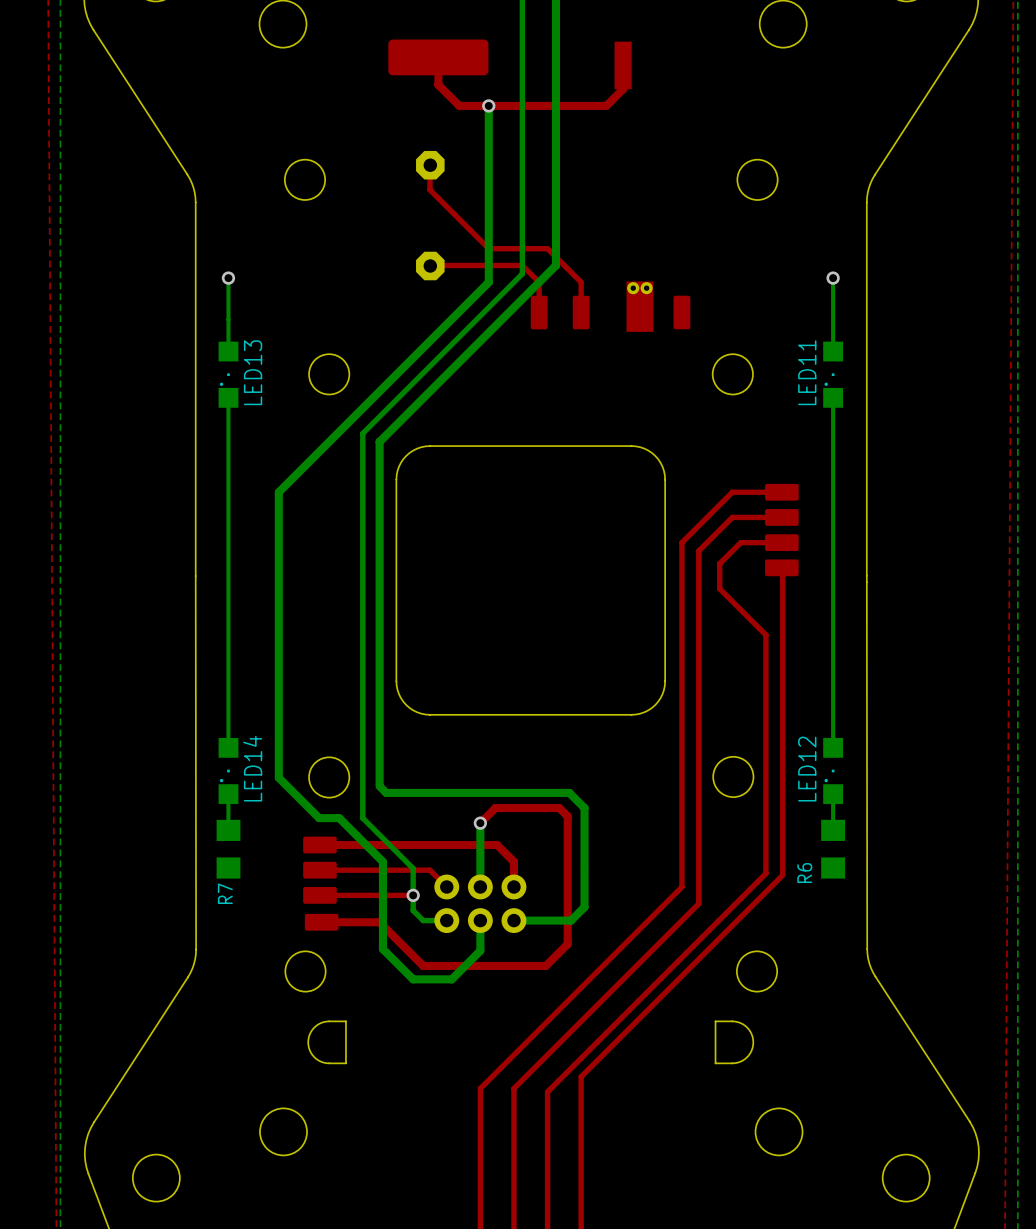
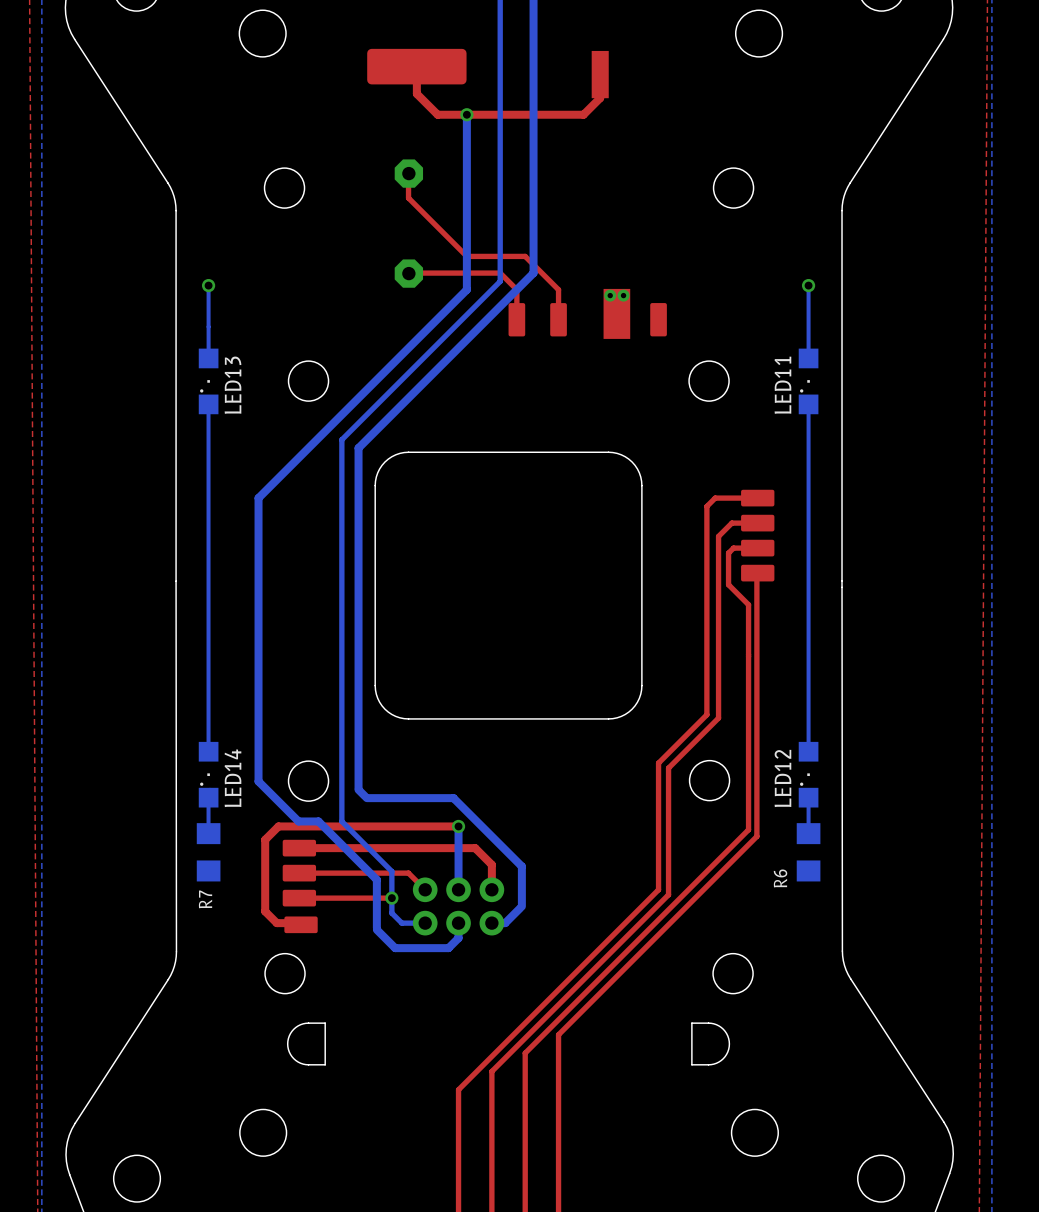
top track: (739, 492) (732, 492) (681, 542) (681, 759) -> (715, 498) (706, 506) (706, 714) (658, 763)
top track: (755, 517) (732, 517) (698, 551) (698, 903) (513, 1088) -> (731, 523) (718, 536) (718, 718) (668, 768) (668, 894) (491, 1071) (491, 1089)
top track: (757, 542) (740, 542) (719, 563) (719, 588) (765, 635) (765, 873) (547, 1091) -> (733, 548) (728, 553) (728, 584) (748, 604) (748, 829) (525, 1053) (525, 1093)
top track: (782, 567) (782, 873) -> none
bottom track: (386, 792) (569, 792) (584, 808) (584, 868) -> none
bottom track: none -> (366, 798) (453, 798) (521, 866) (521, 906)
top track: (480, 823) (495, 808) (559, 808) (567, 816) (567, 944) (545, 965) (423, 965) (379, 922) (320, 922) -> (458, 826) (278, 826) (265, 839) (265, 911) (276, 923) (301, 923)
bottom track: (382, 861) (382, 949) (413, 979) (451, 979) (480, 950) (480, 935) -> (376, 929) (395, 948) (448, 948) (458, 938)
bottom track: none -> (361, 864) (376, 879) (376, 928)
bottom track: (584, 870) (584, 907) (571, 920) (527, 920) -> (520, 908) (505, 923)
top track: (782, 875) (581, 1076) -> (756, 573) (756, 836) (558, 1034) (558, 1078)

